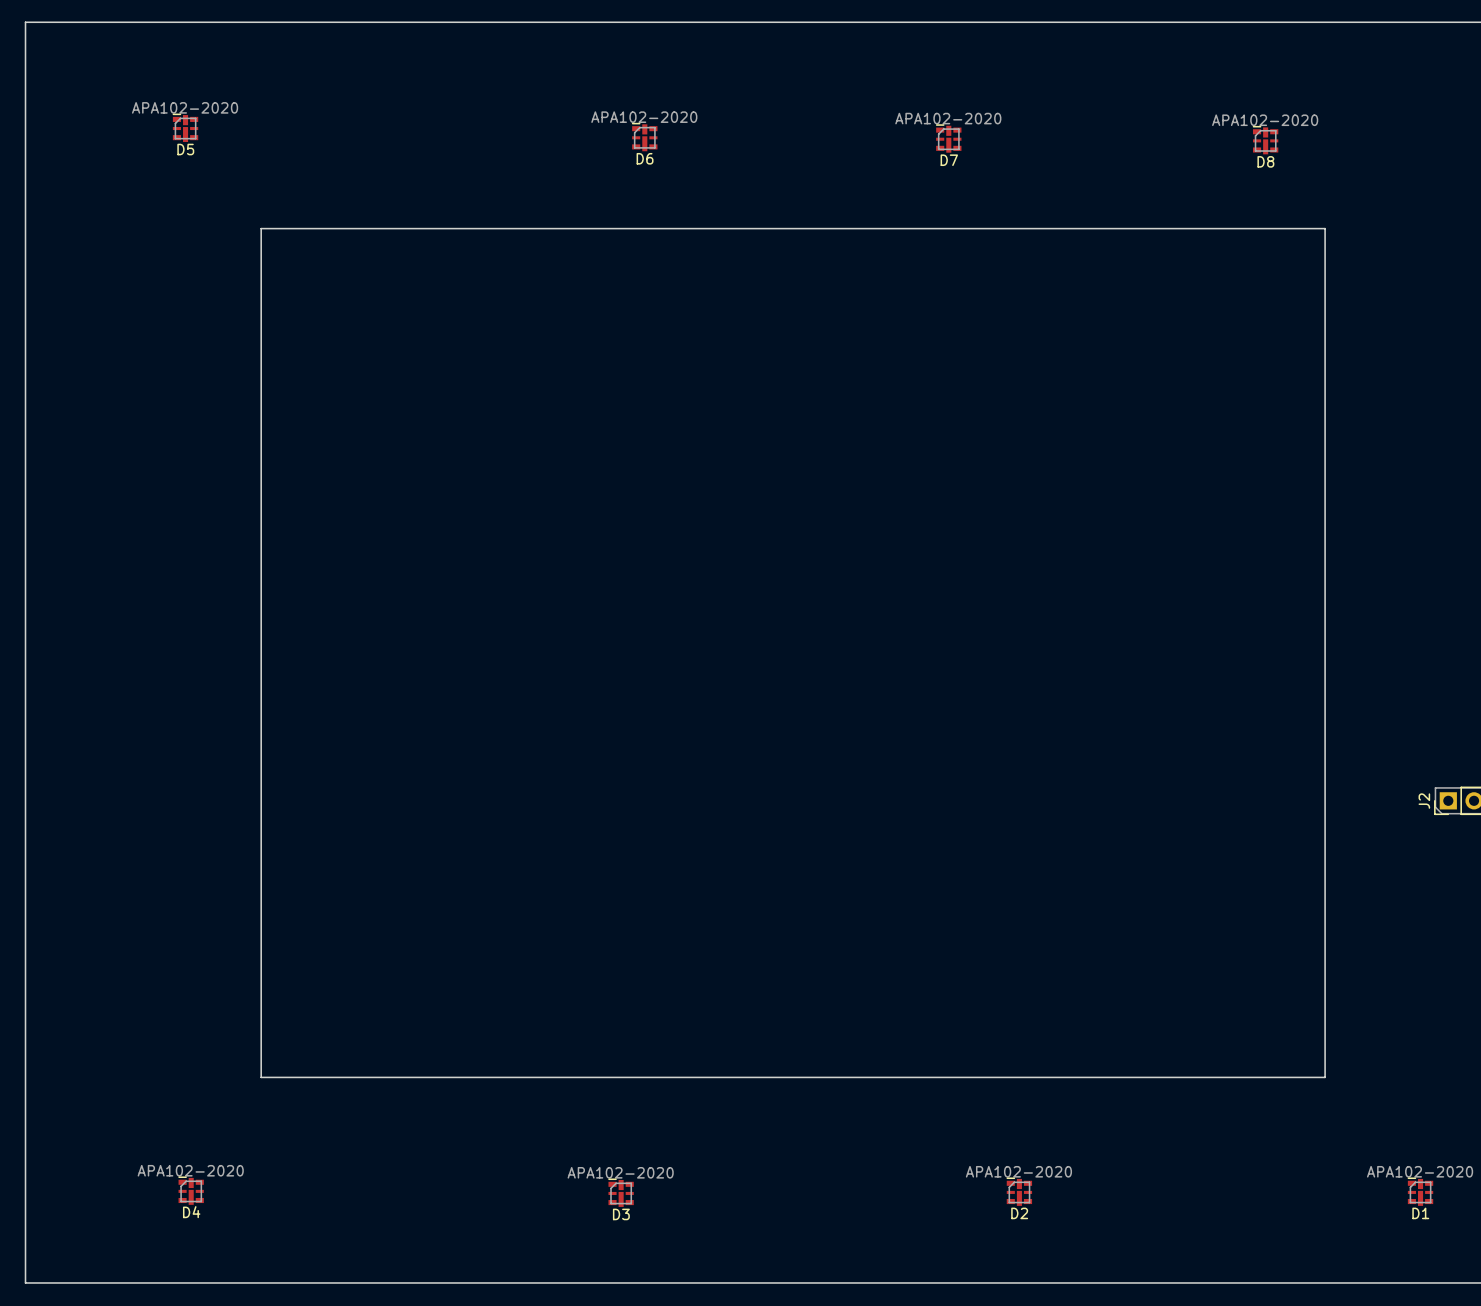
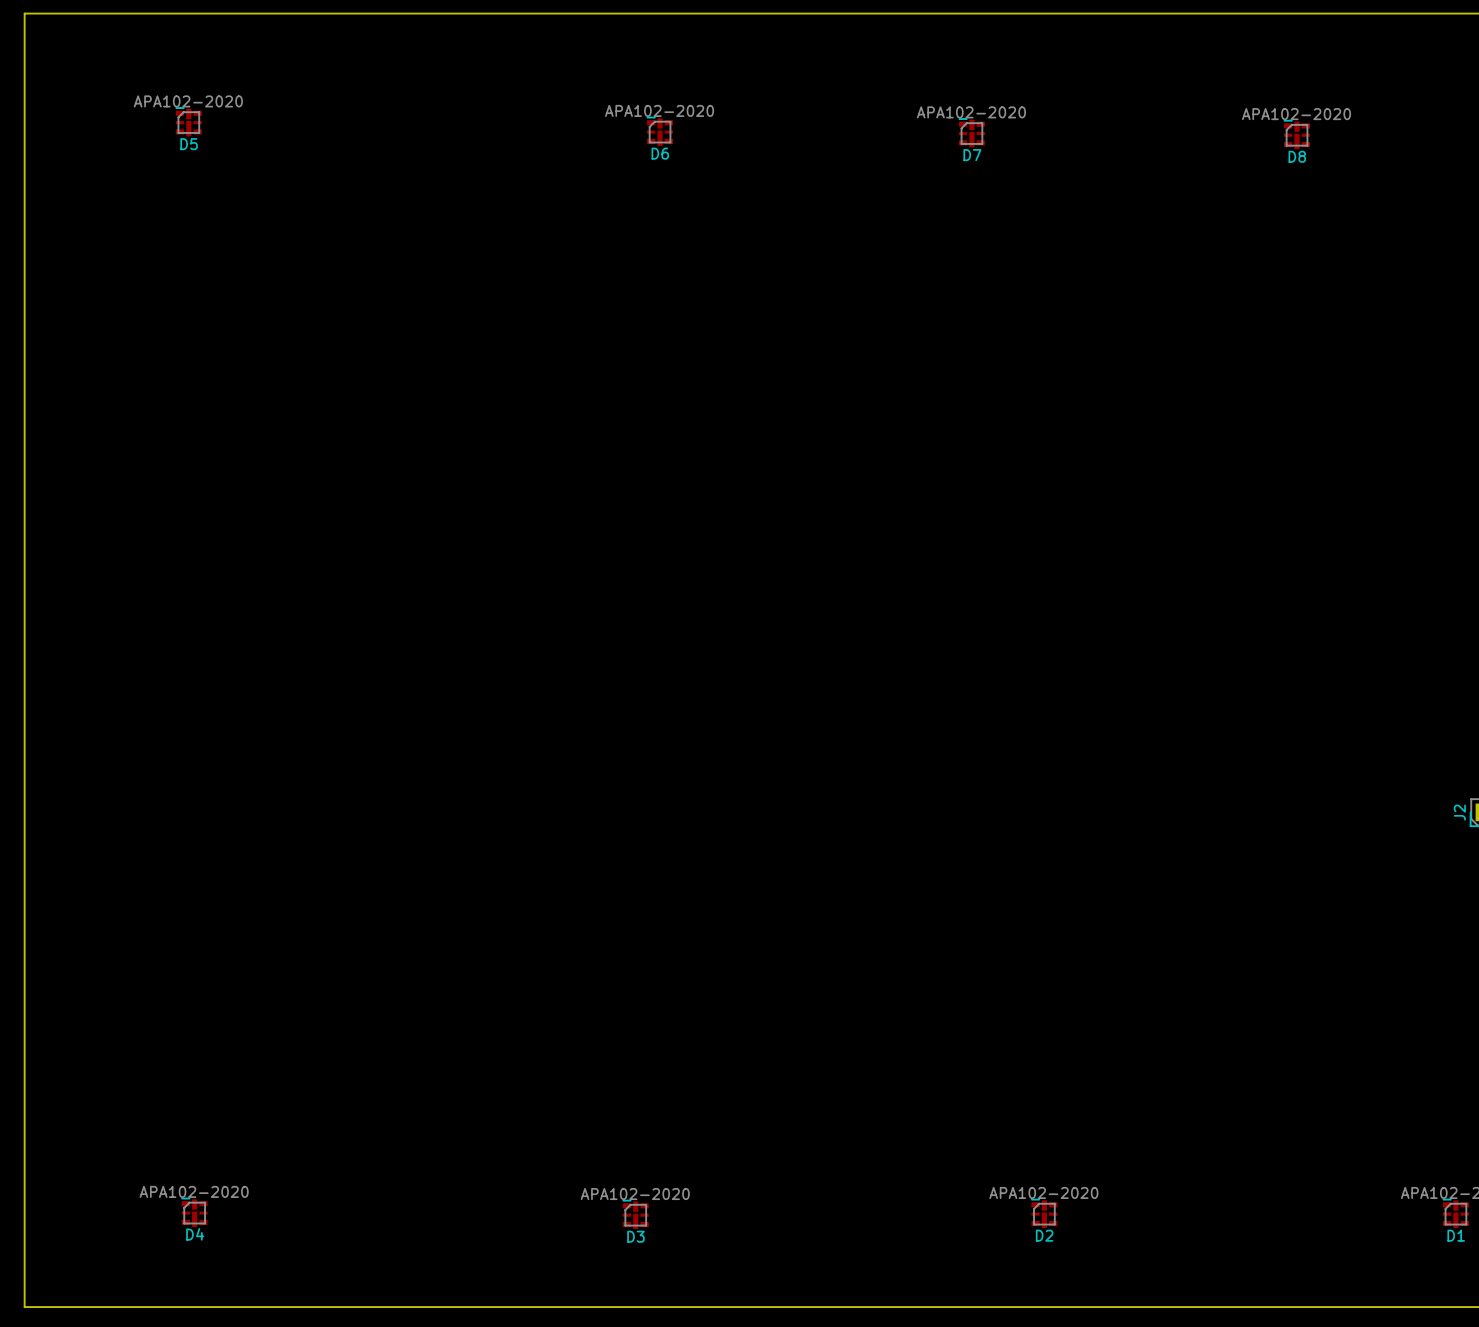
board edge: (261, 228) (1325, 228) (1325, 1077) (261, 1077) (261, 228) -> none

